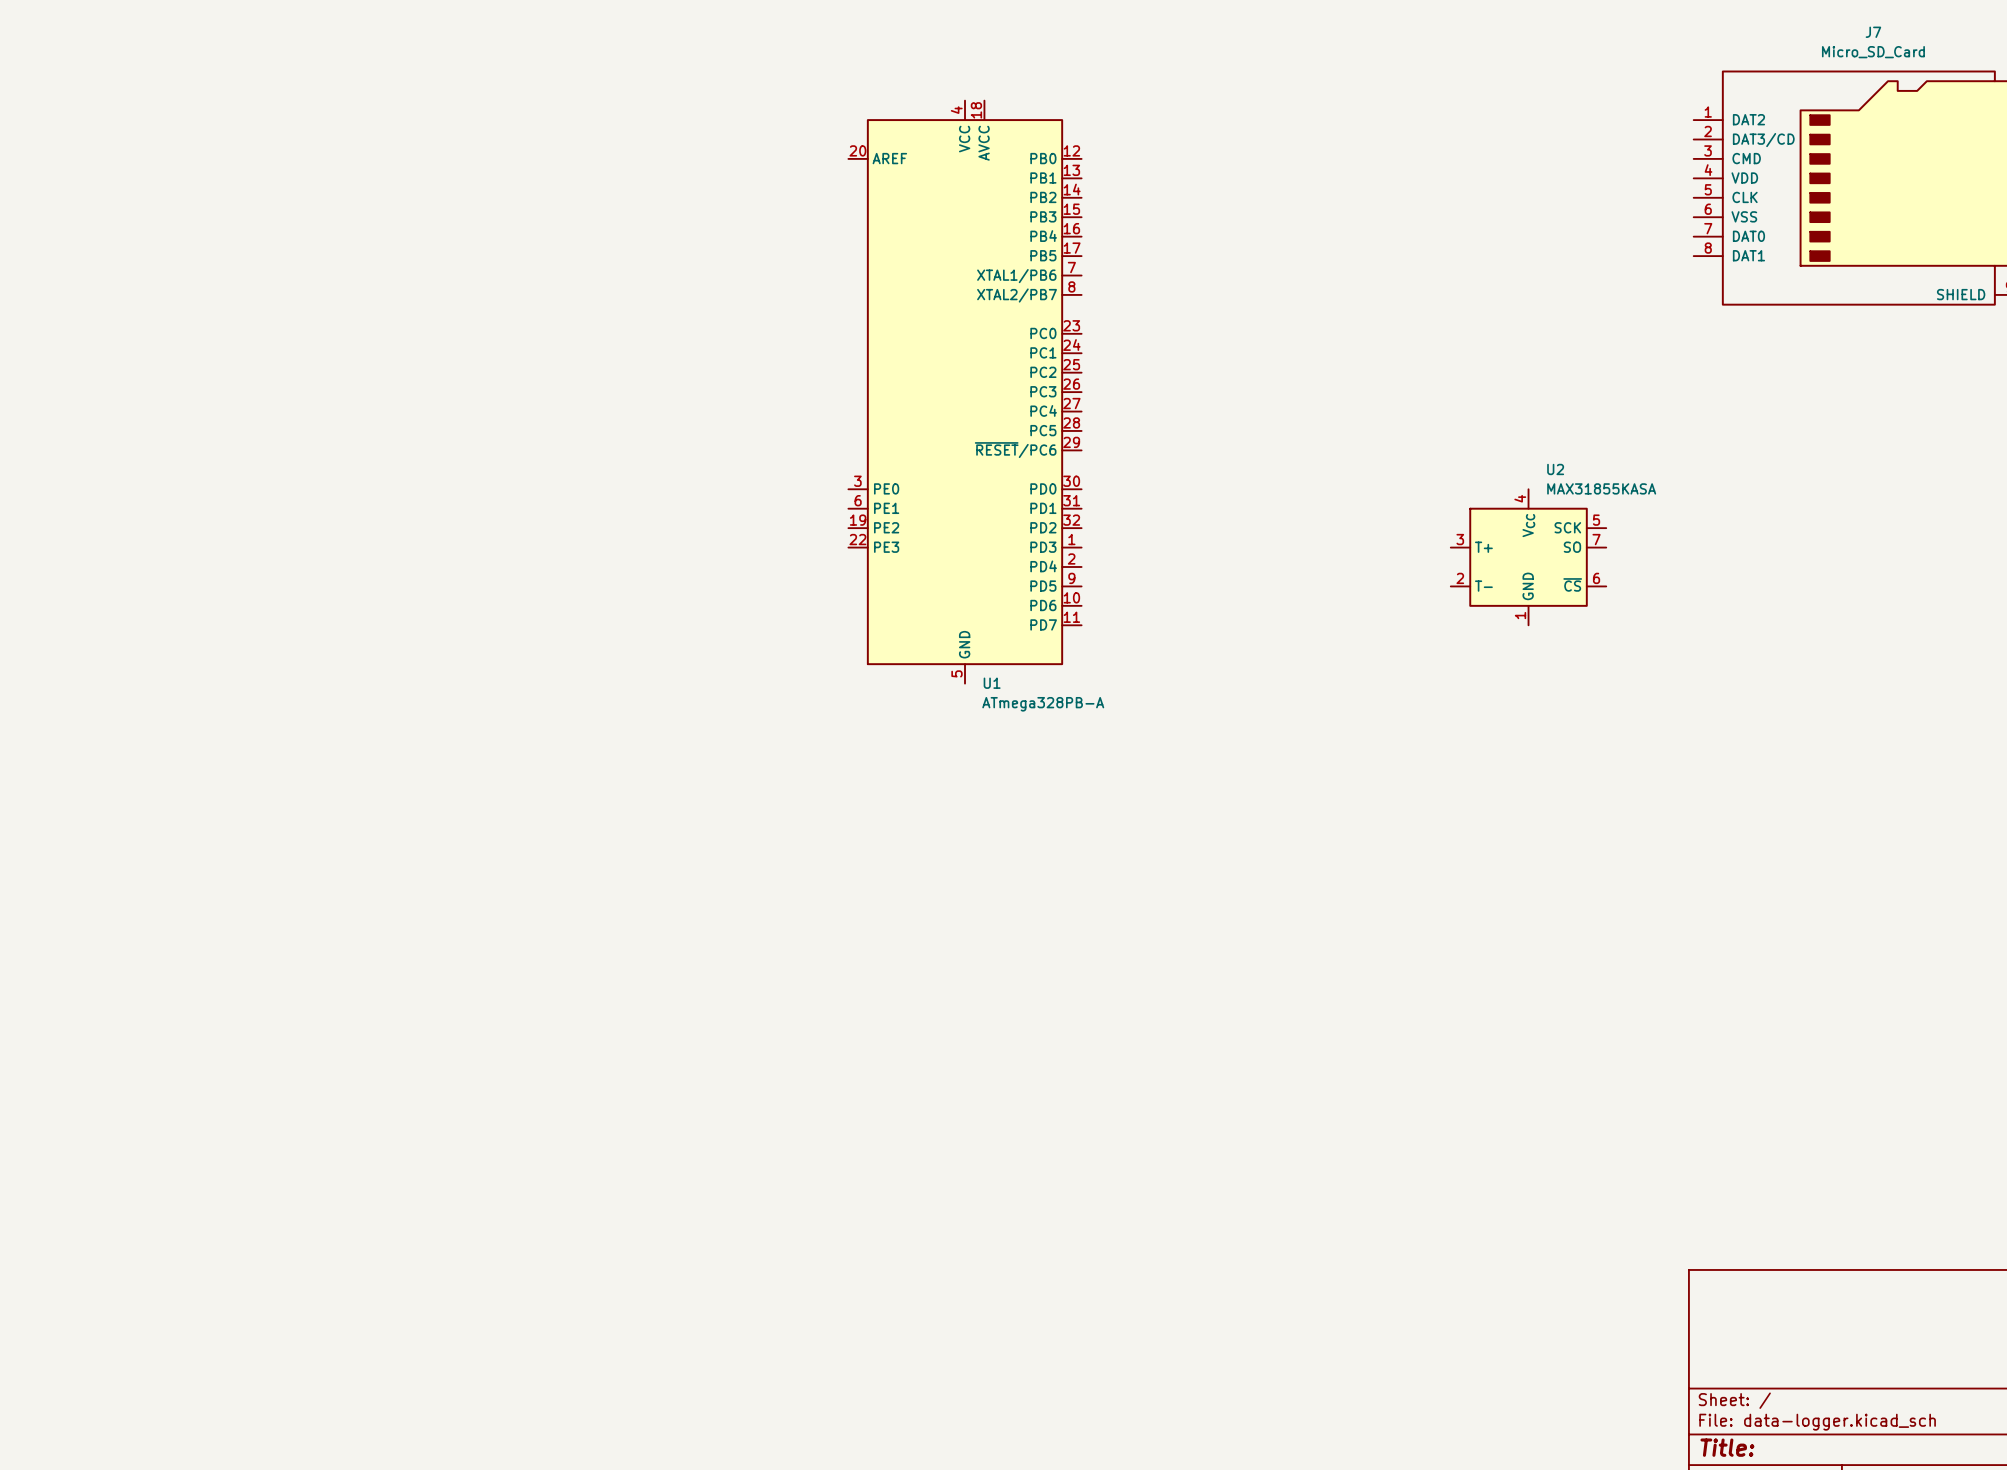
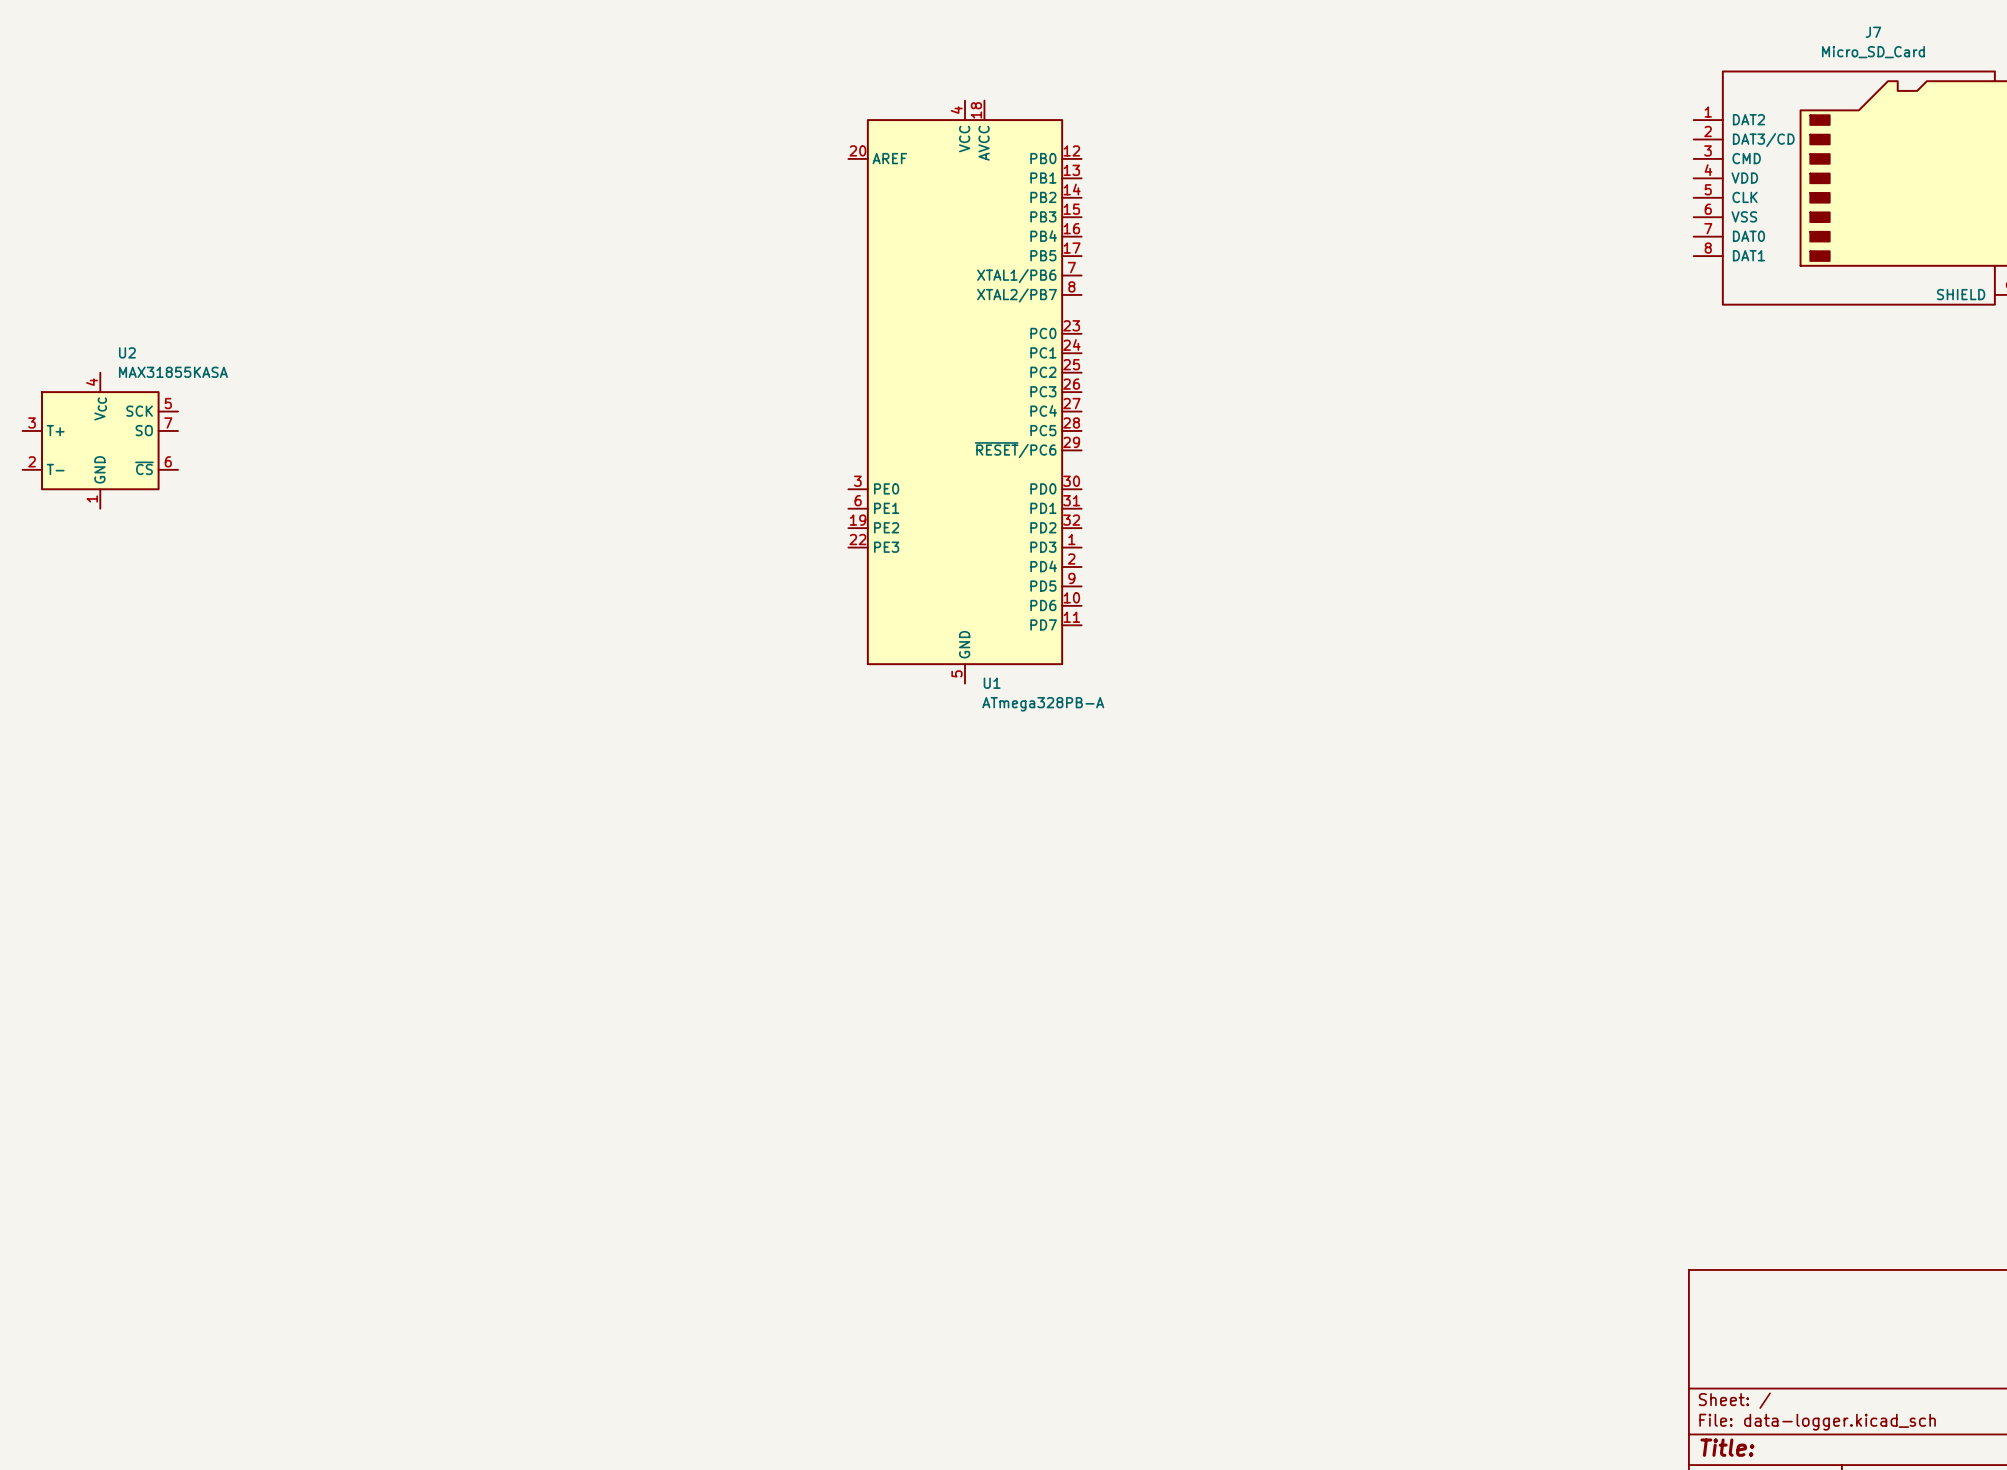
U2 position: (1528, 557) -> (100, 440)

